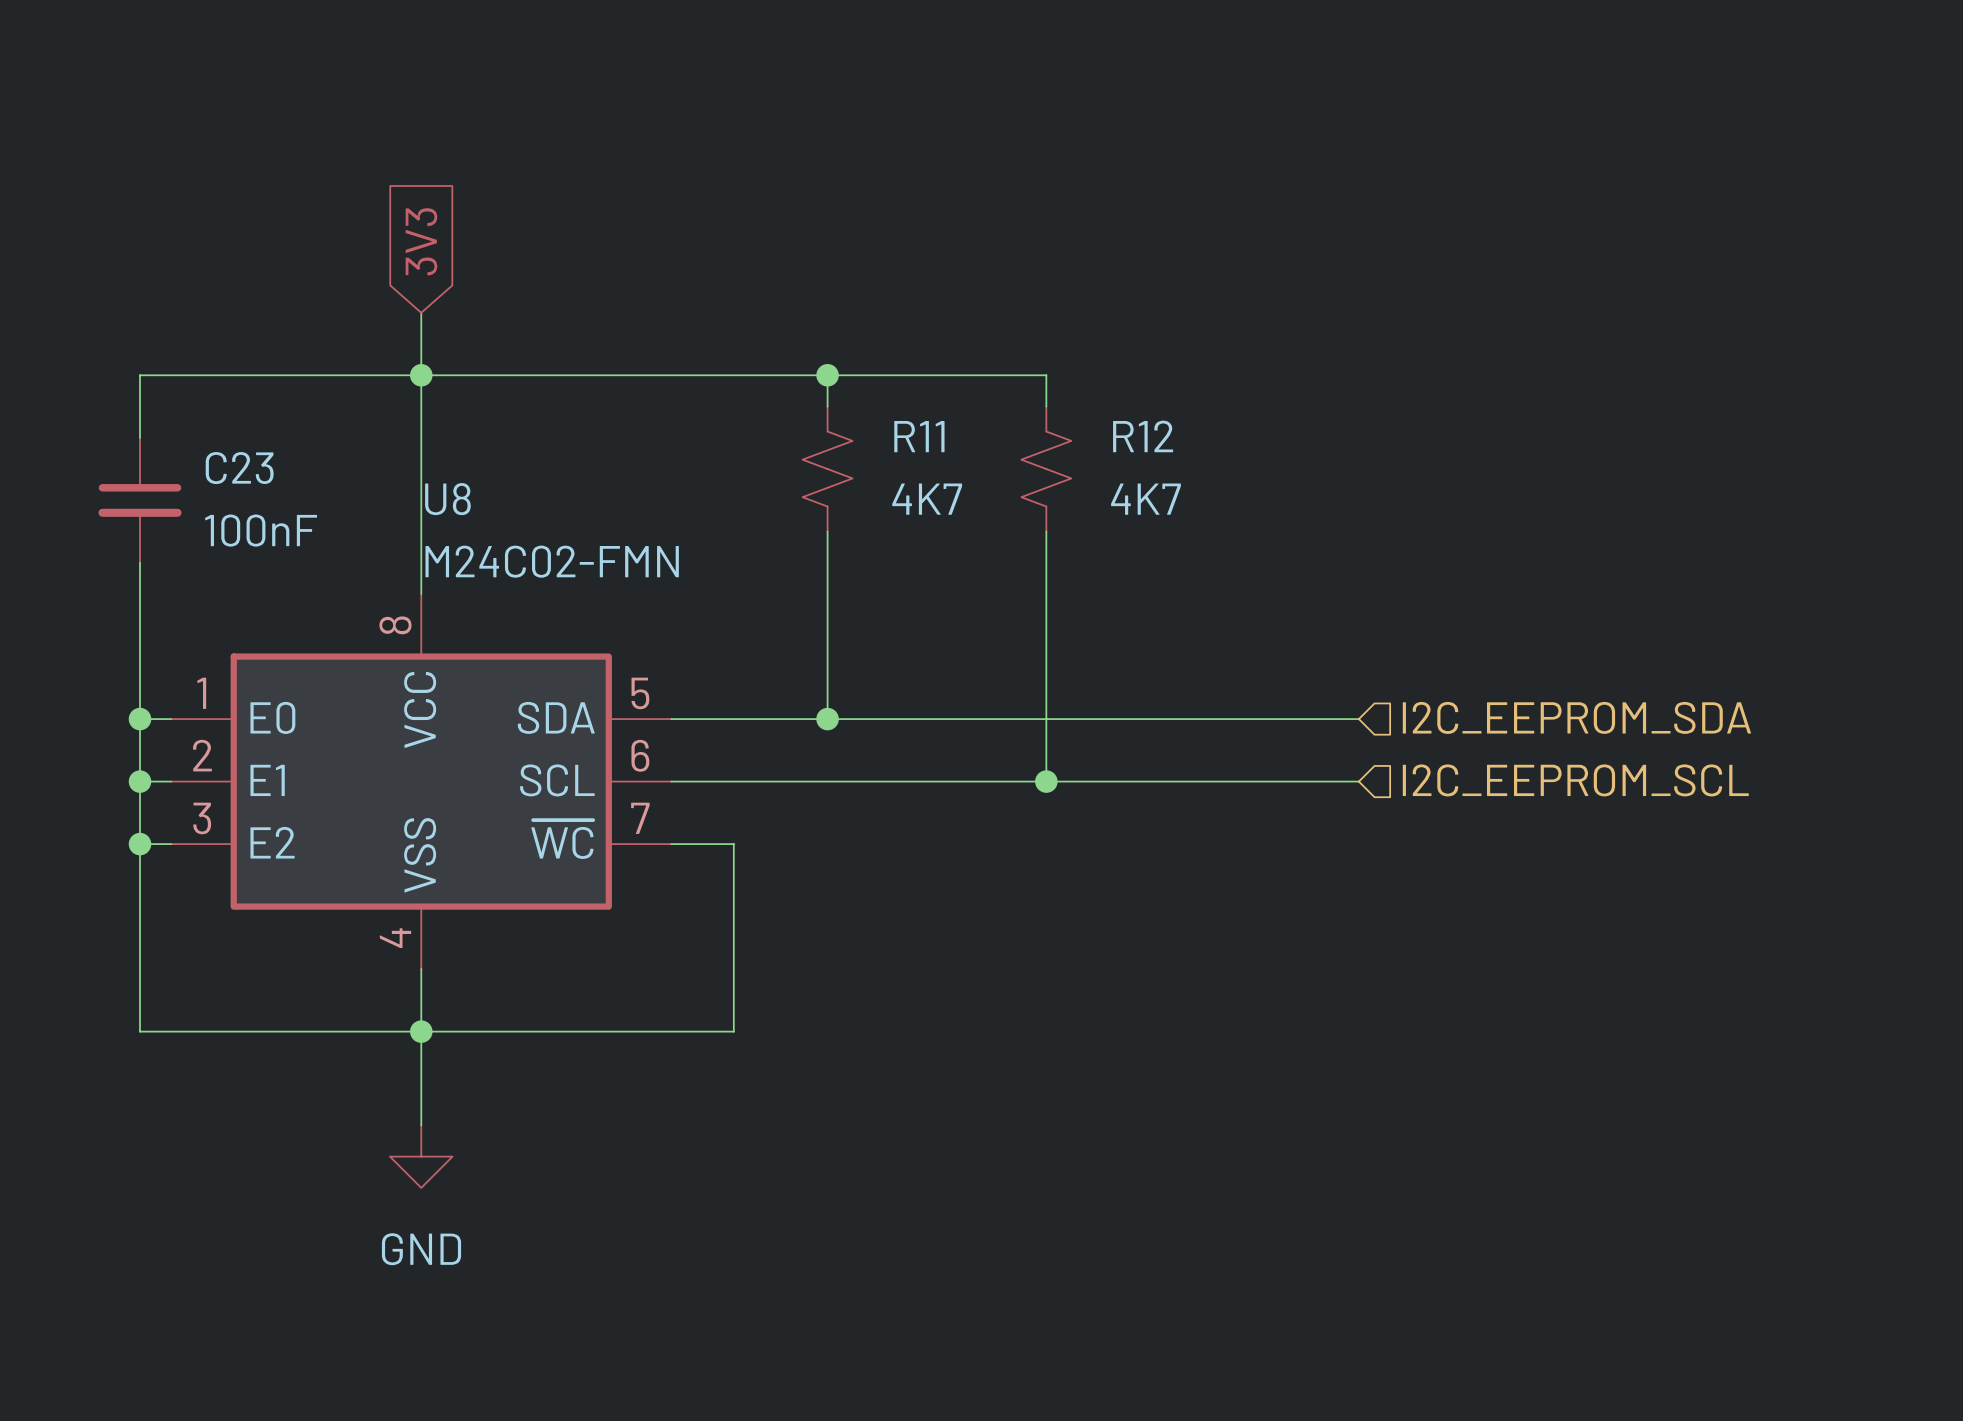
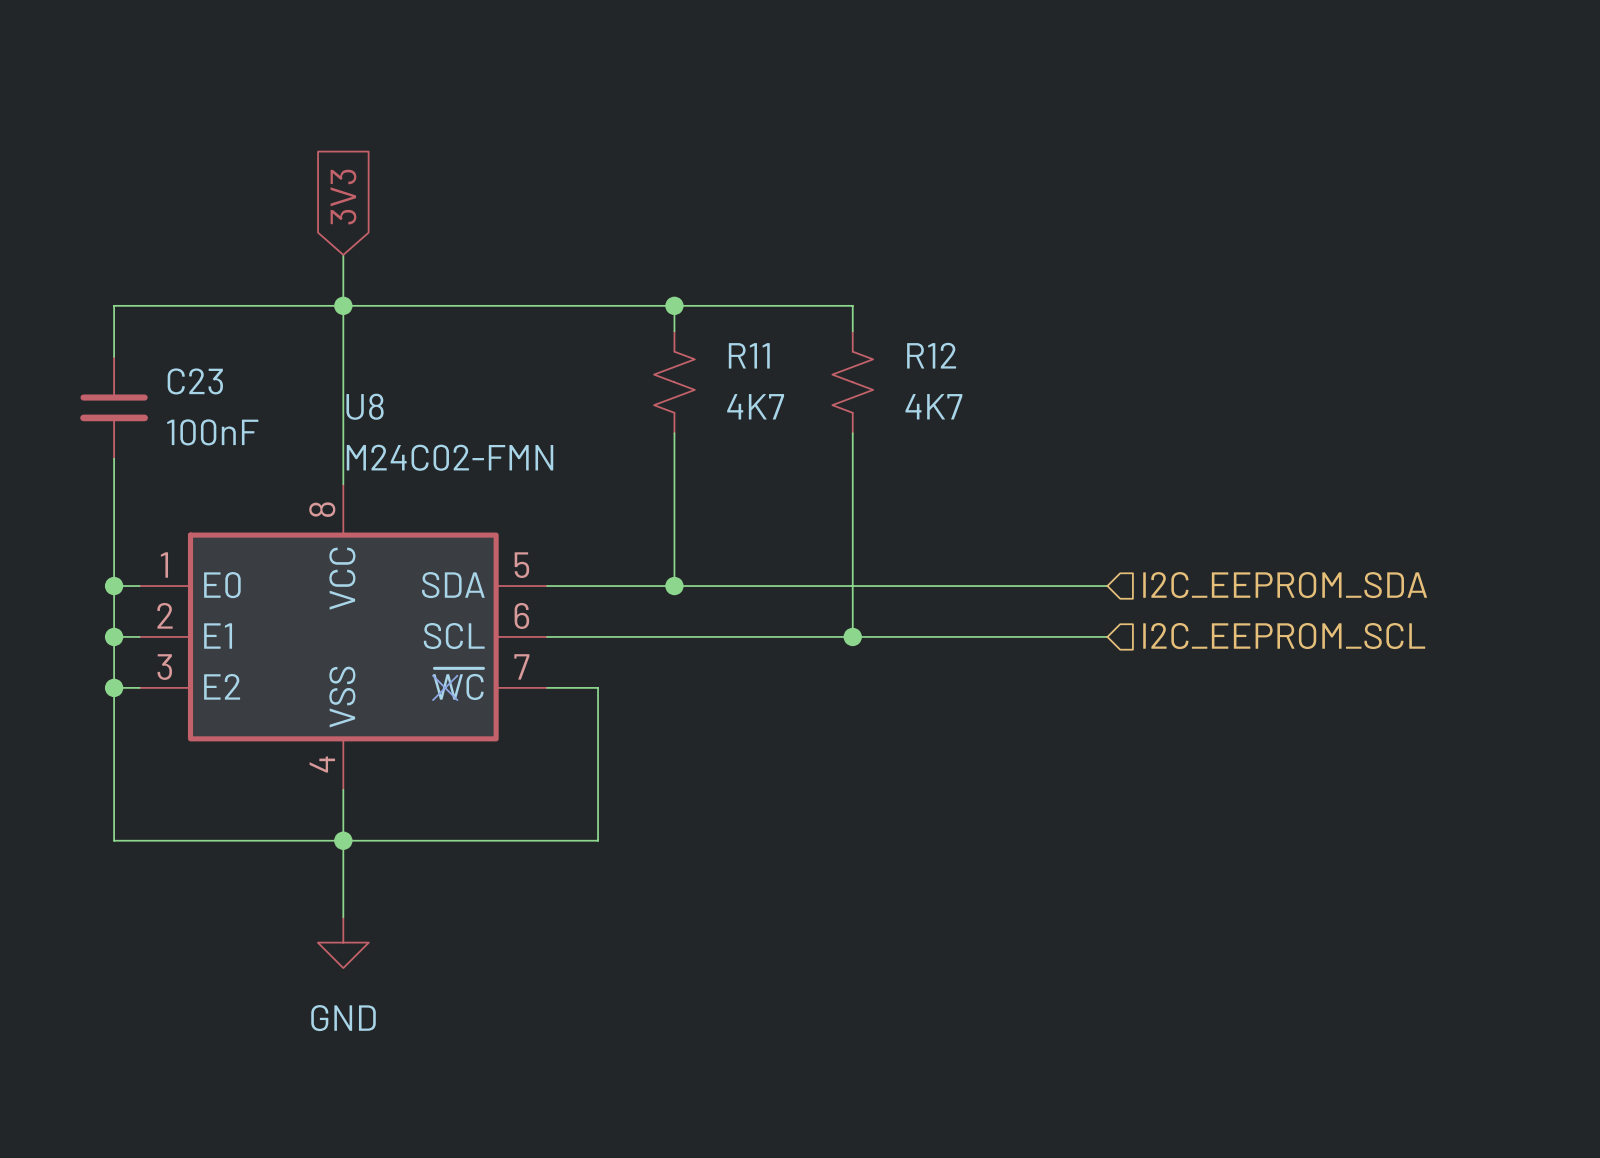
no-connect mark: none -> (445, 687)

